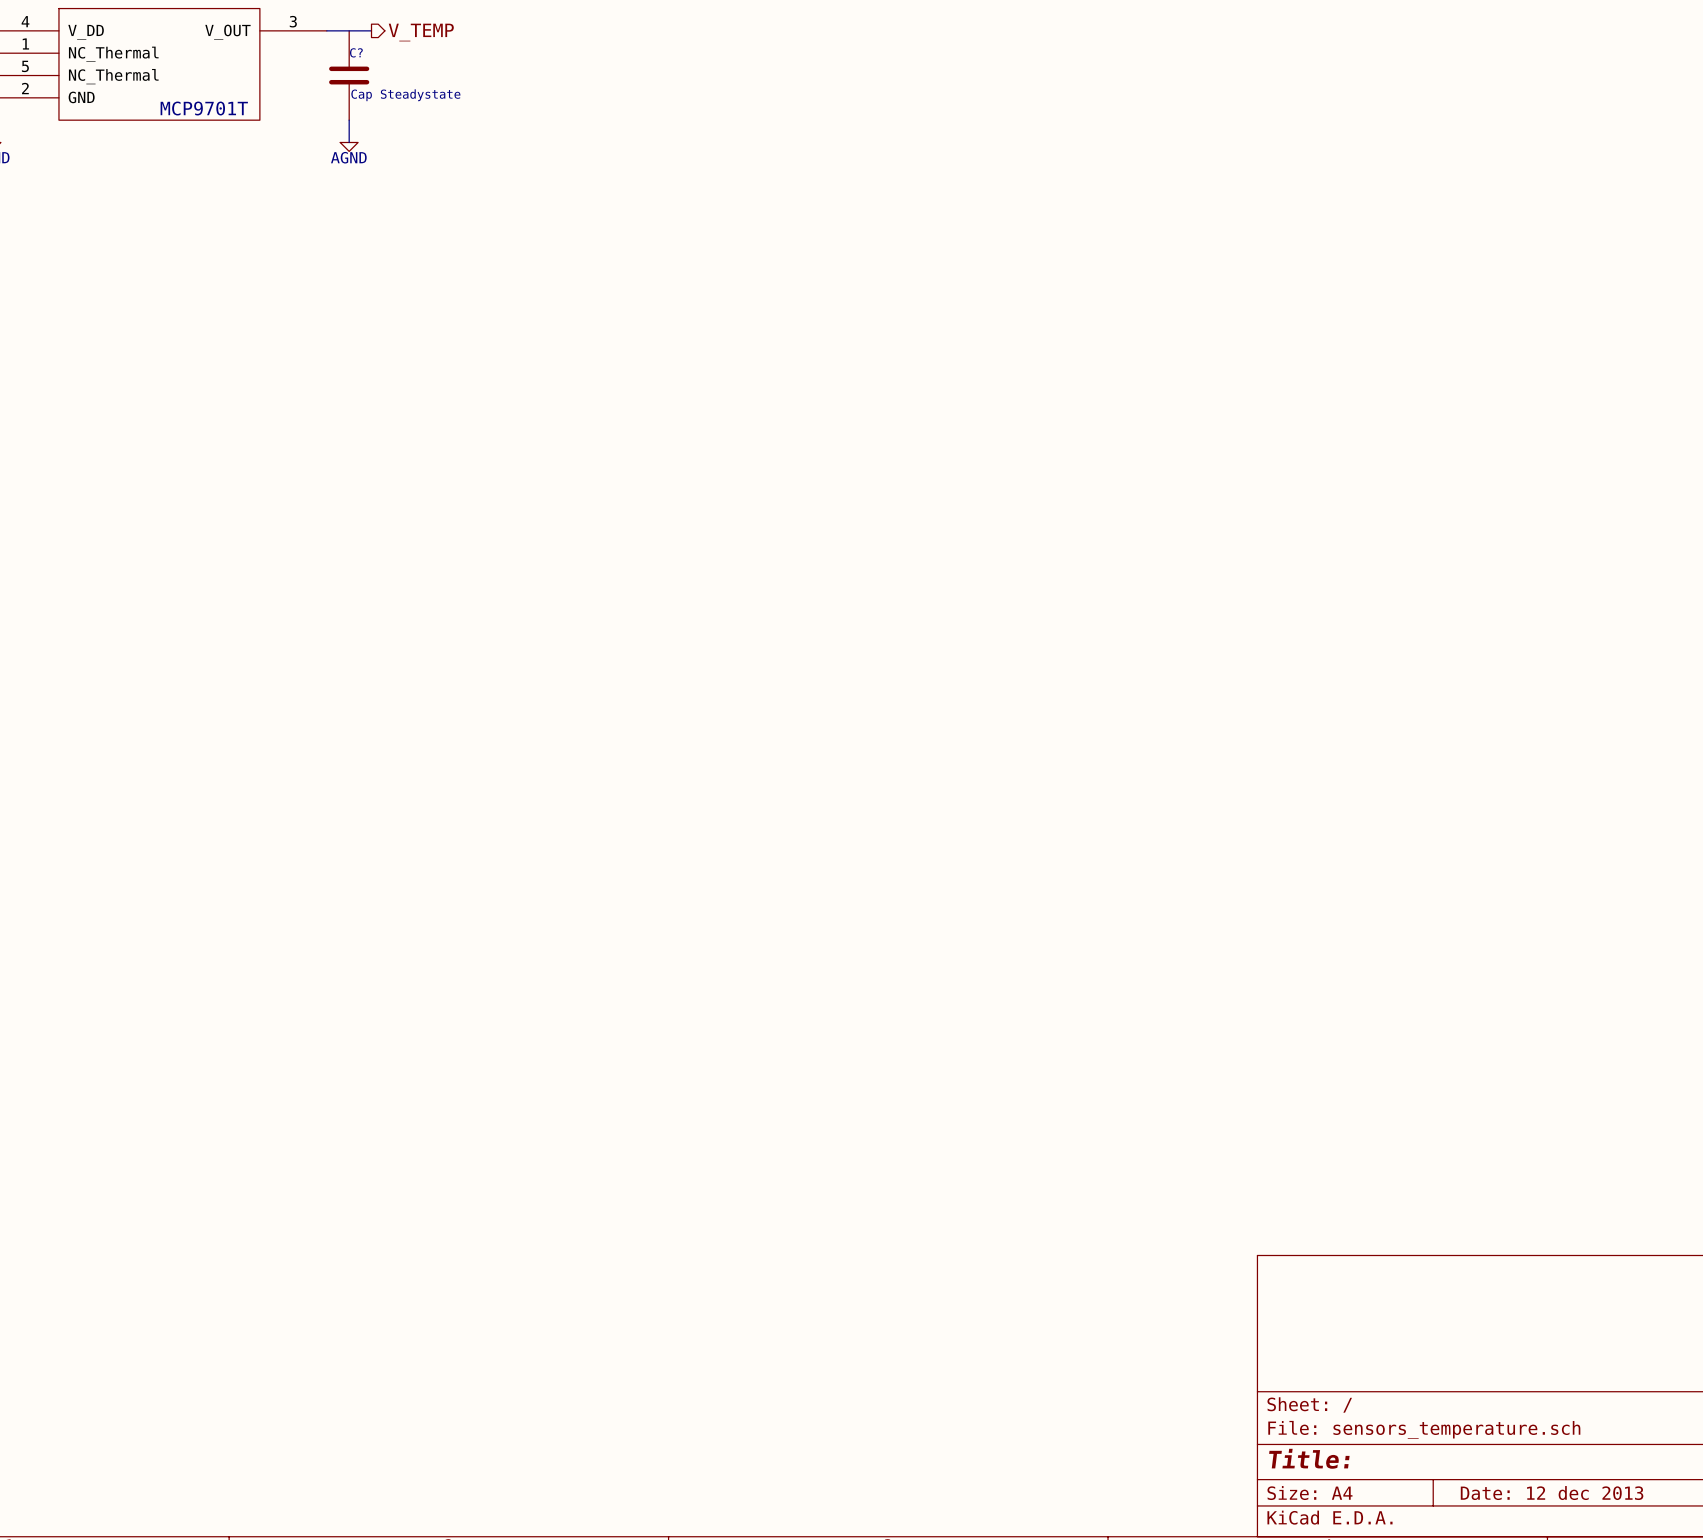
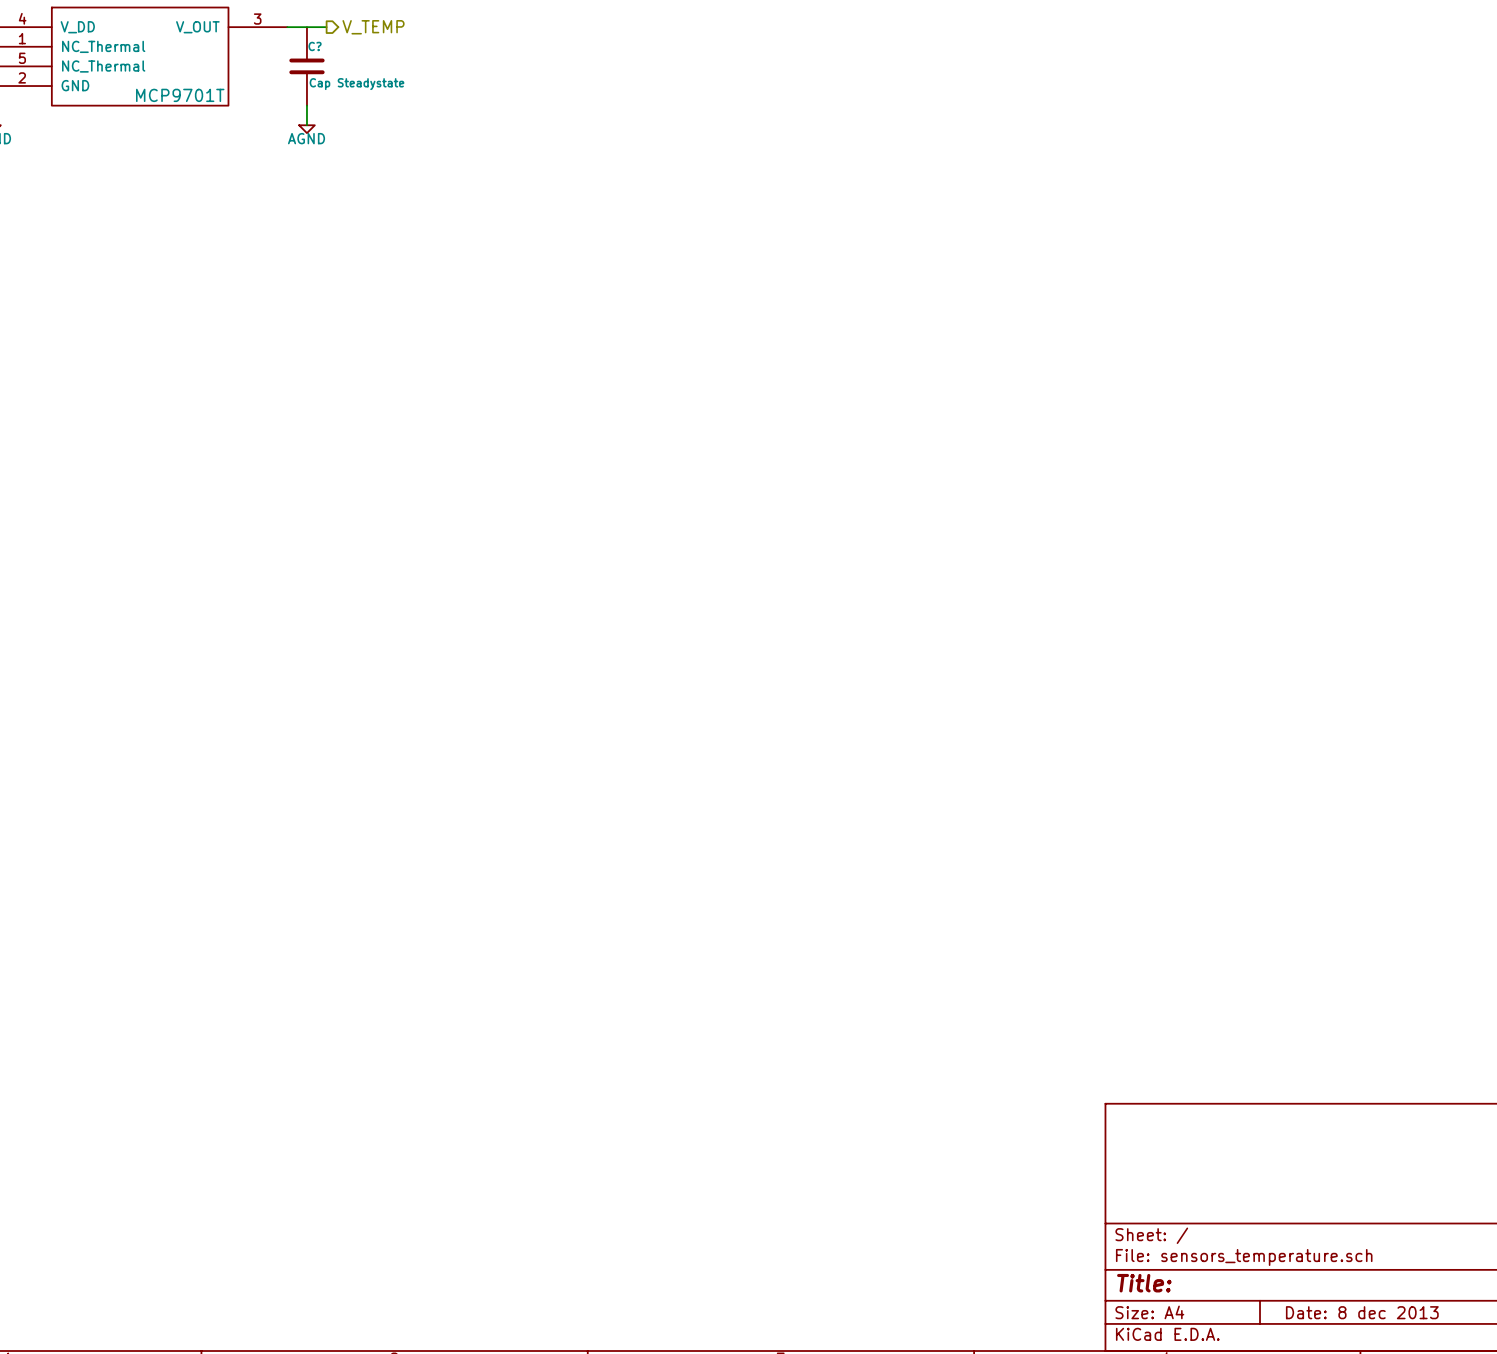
title block: Date: 12 dec 2013 (1552, 1493) -> Date: 8 dec 2013 (1362, 1312)

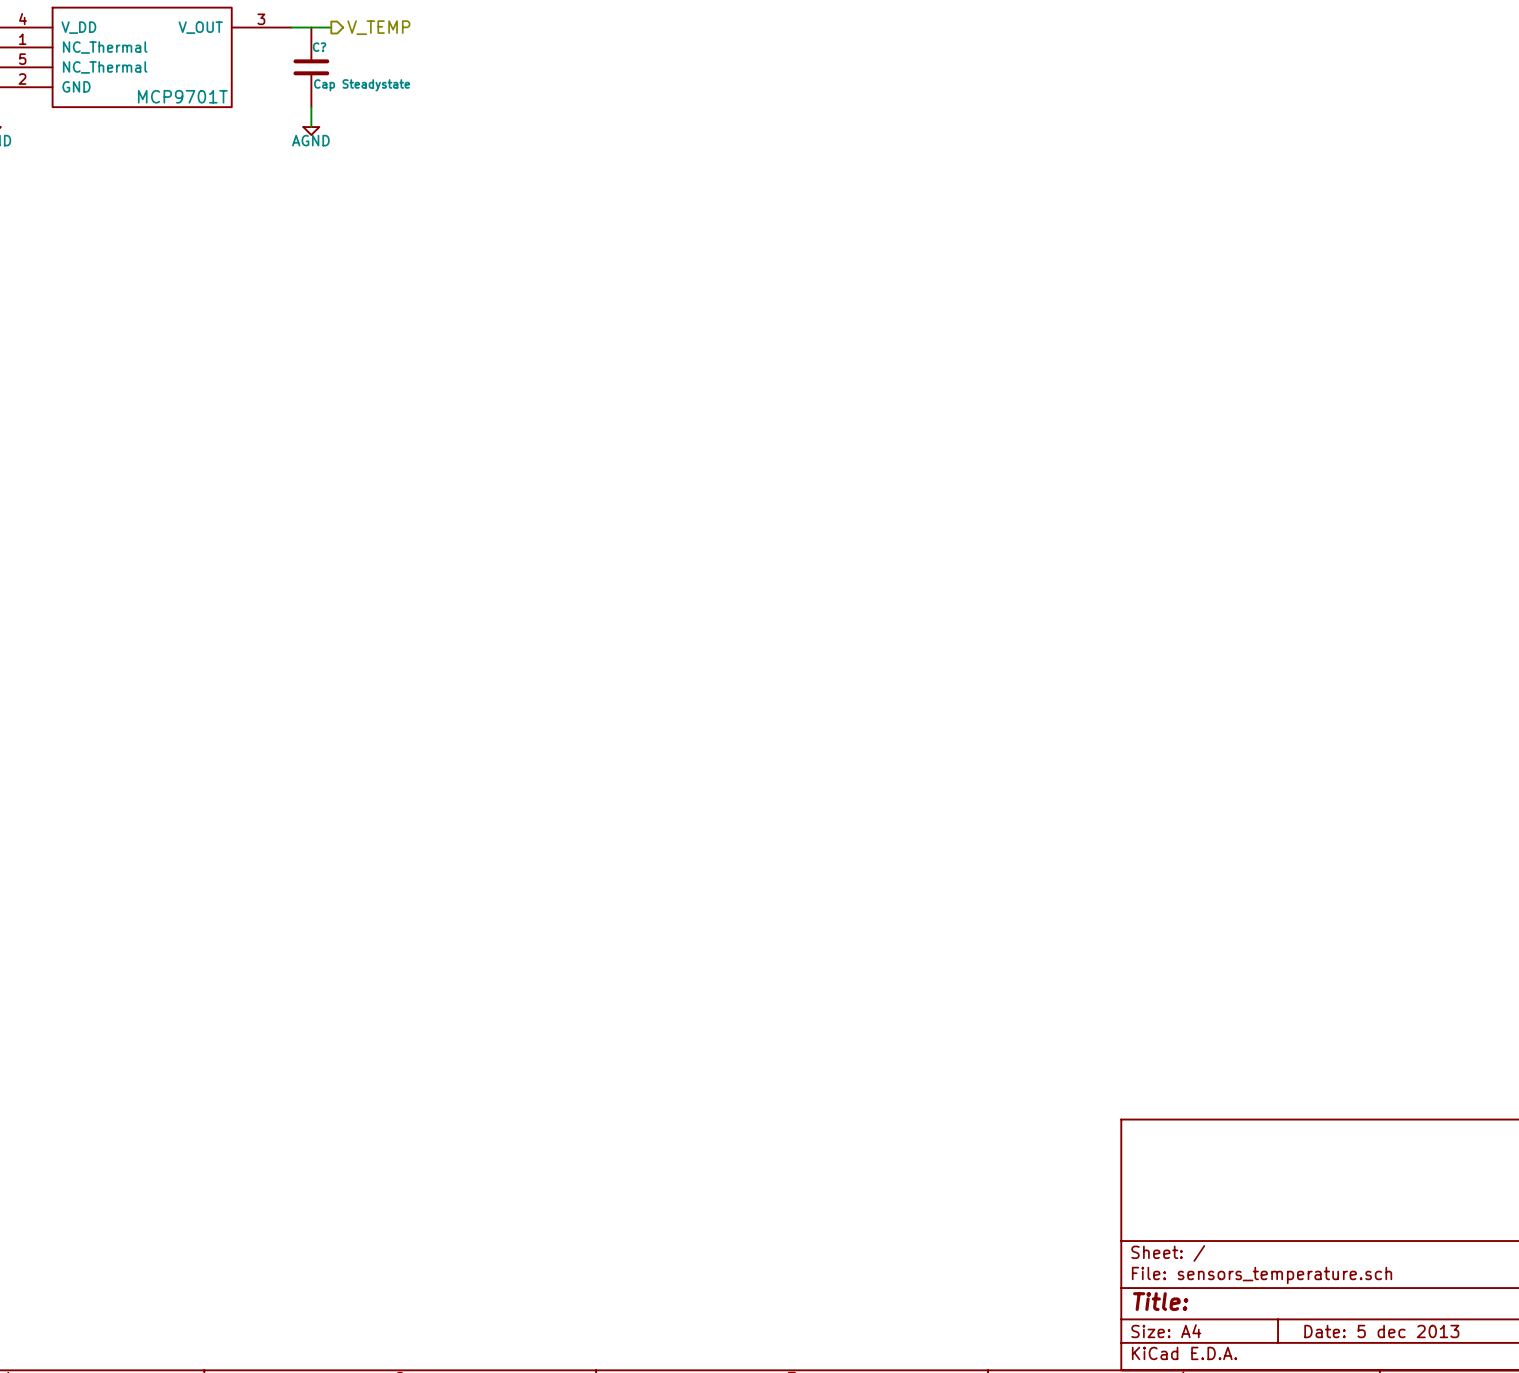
title block: Date: 8 dec 2013 (1362, 1312) -> Date: 5 dec 2013 (1381, 1331)

